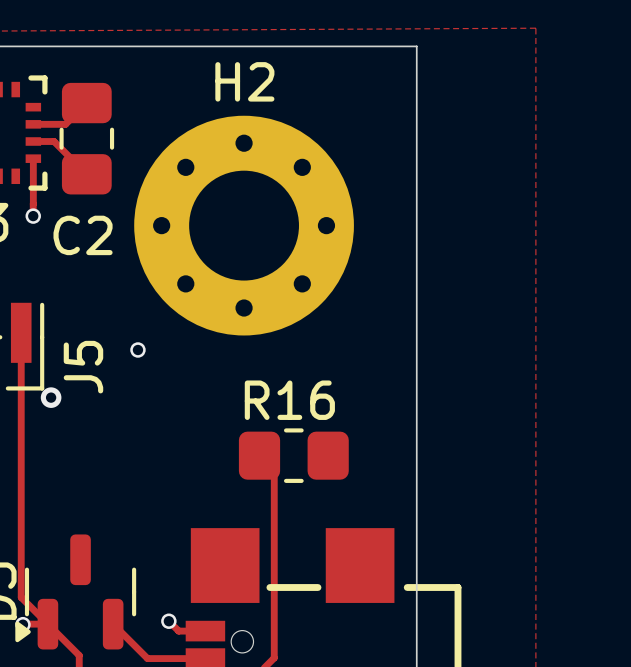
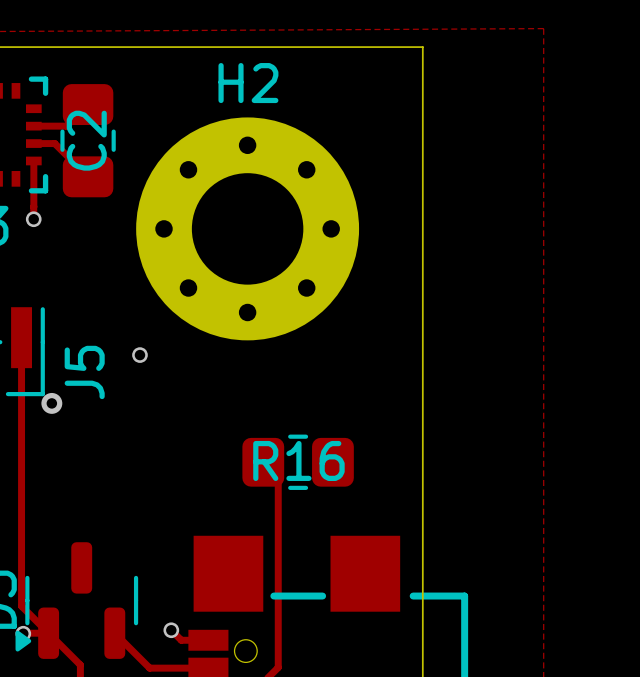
C2 name rotation: 0° (83, 235) -> 90° counterclockwise (86, 140)
C2 name position: C2 (83, 235) -> C2 (86, 140)
R16 name position: R16 (289, 400) -> R16 (298, 460)

